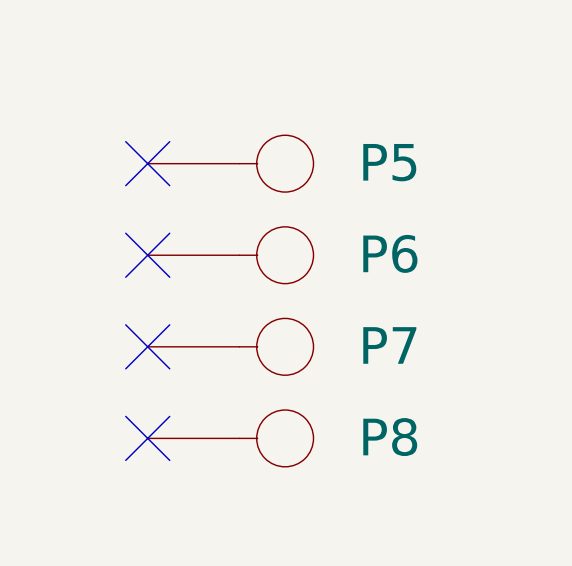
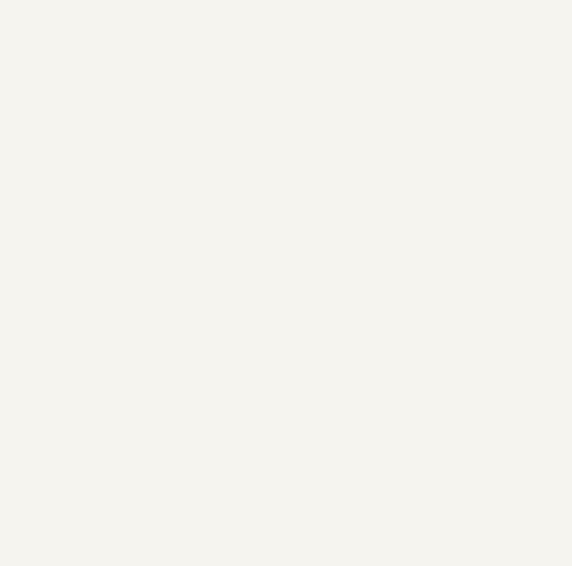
no-connect mark: (147, 163) -> none
P5: (230, 163) -> none
no-connect mark: (147, 255) -> none
P6: (230, 255) -> none
no-connect mark: (147, 346) -> none
P7: (230, 346) -> none
no-connect mark: (147, 438) -> none
P8: (230, 438) -> none

